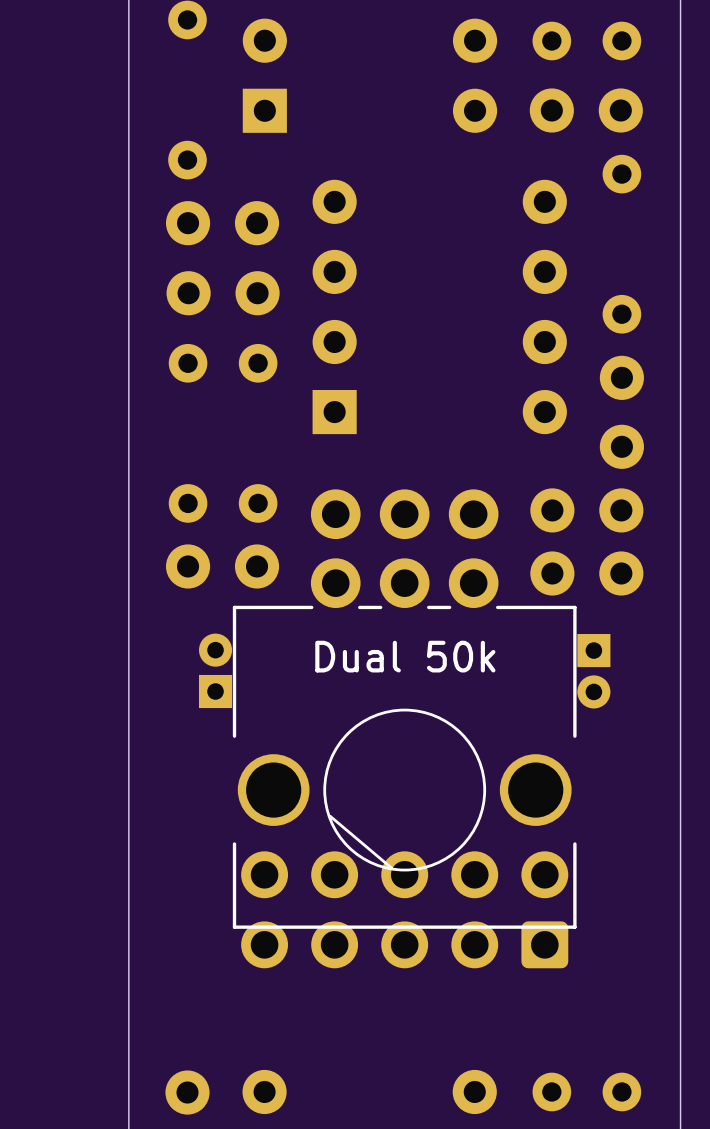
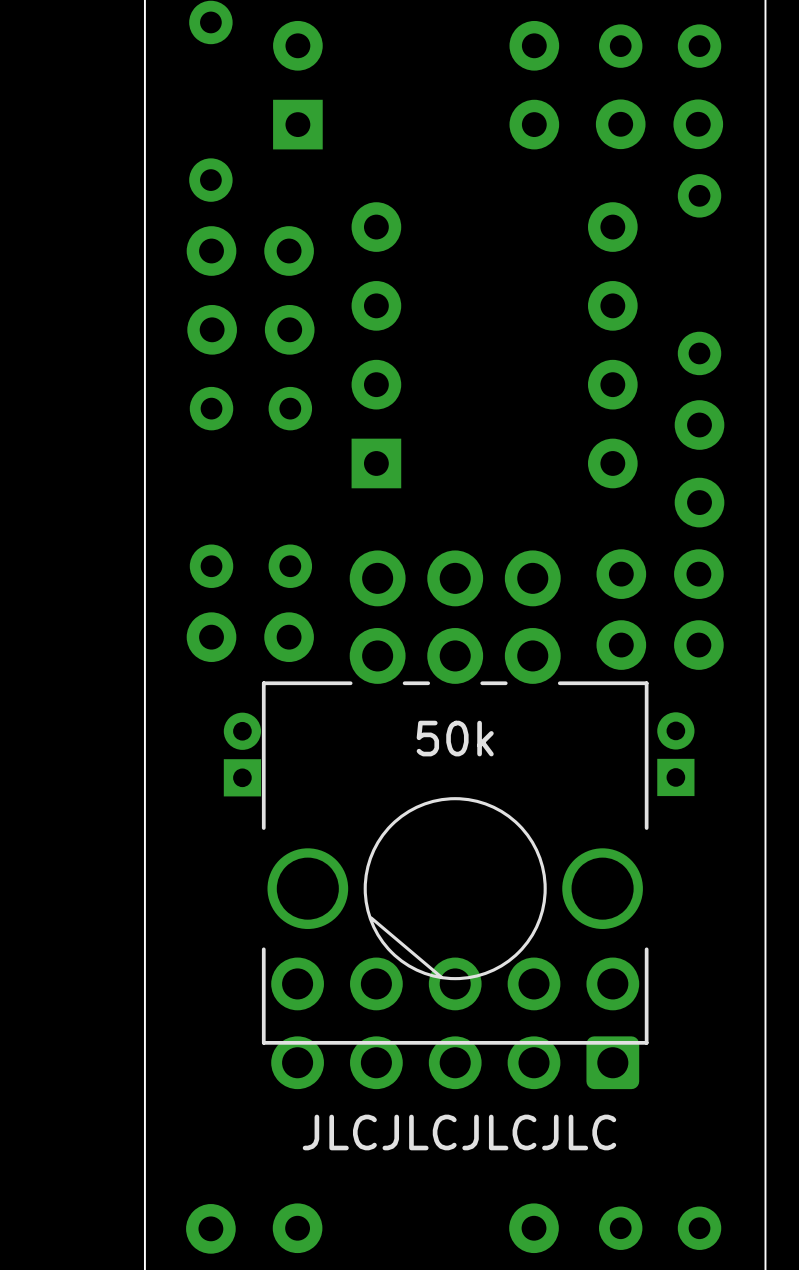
part text: Dual 50k (405, 656) -> 50k (455, 738)
part rotation: 0° (593, 671) -> 180° (675, 754)
text: none -> JLCJLCJLCJLC (459, 1132)

